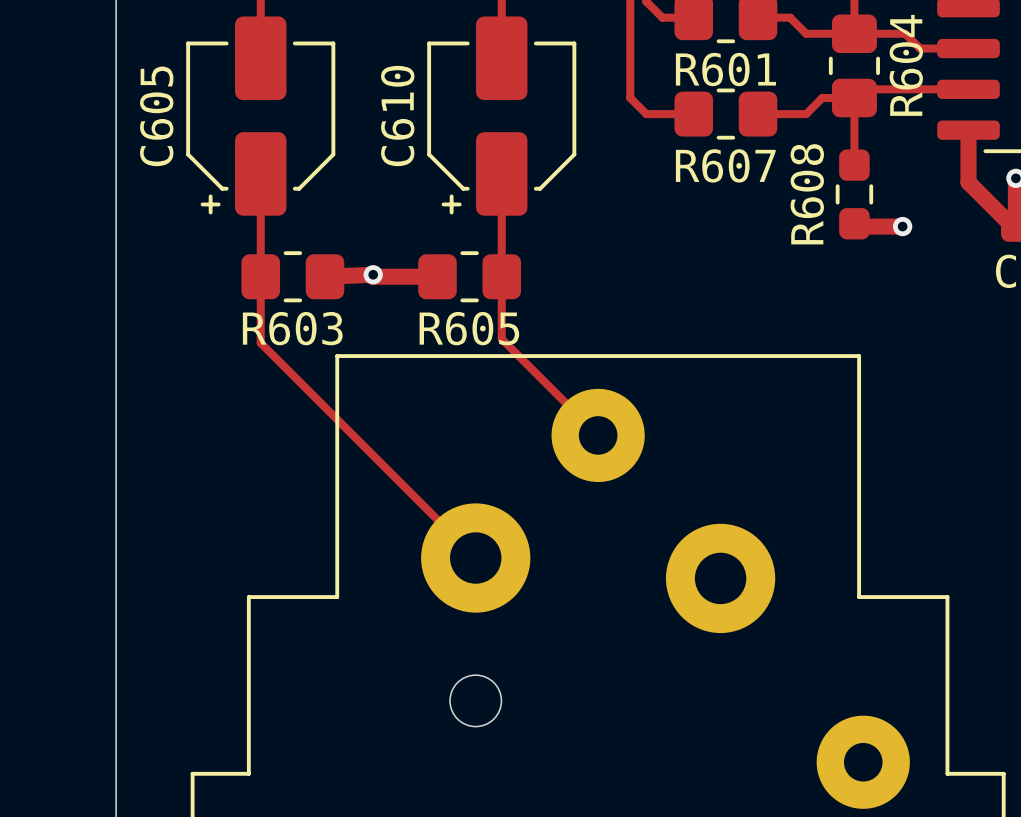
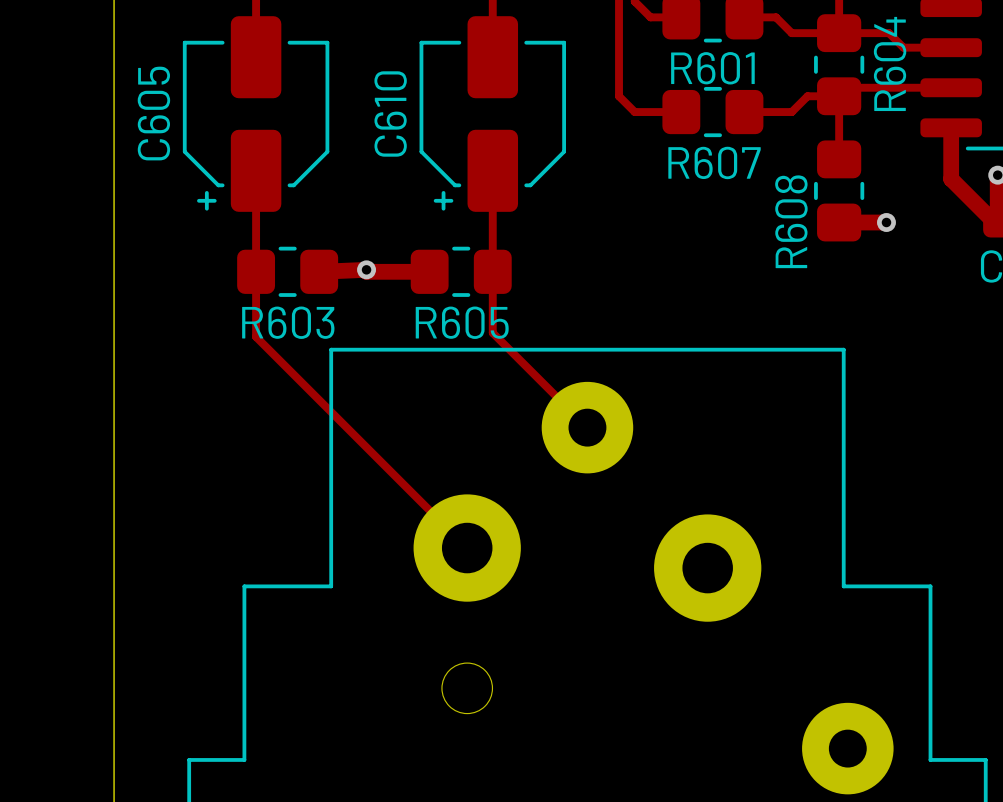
R608 footprint: [835, 149, 874, 240] -> [814, 140, 865, 242]
R608 name position: R608 (807, 194) -> R608 (791, 221)

